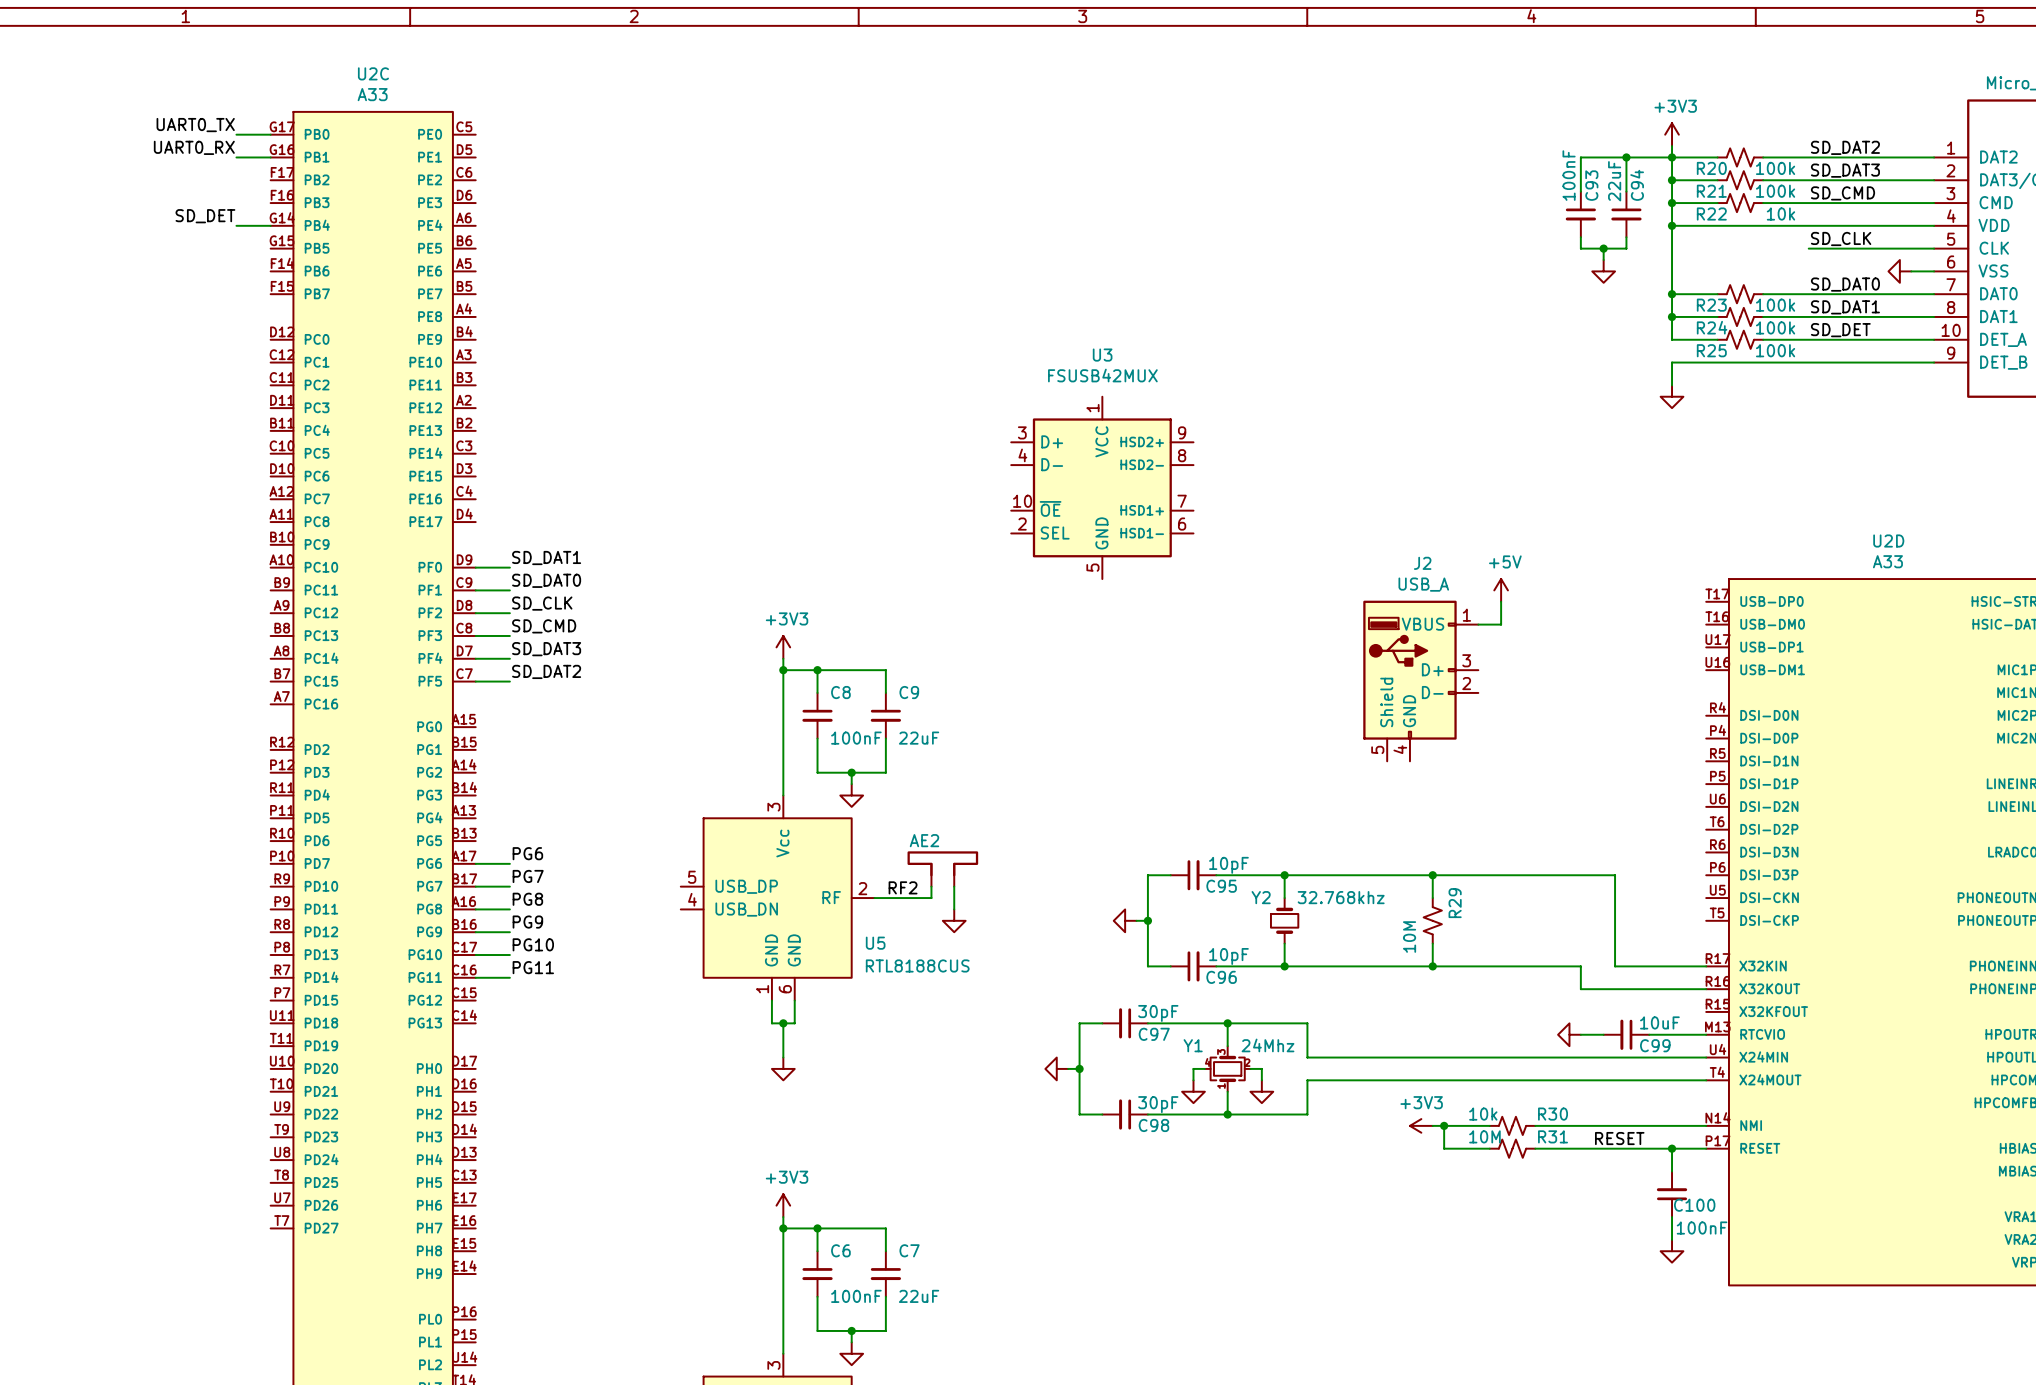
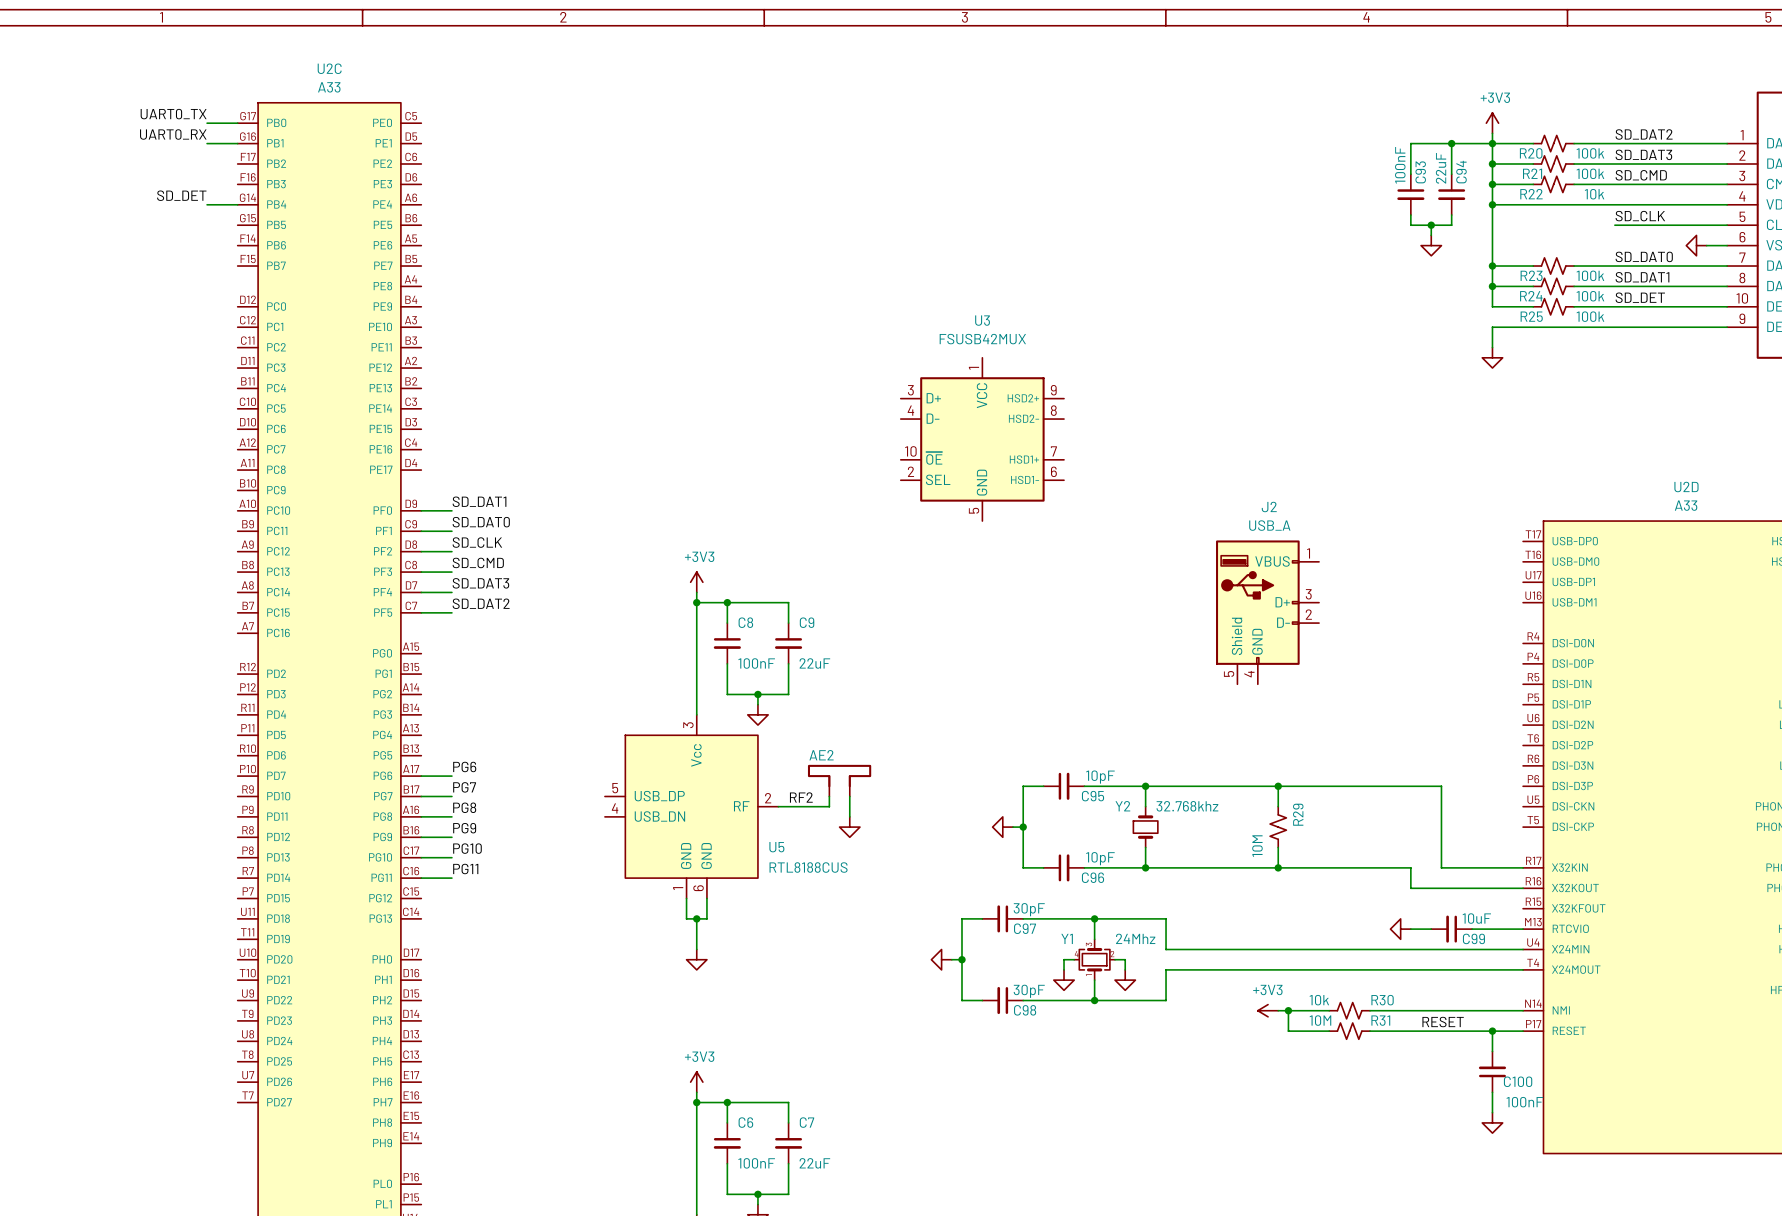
power symbol: +5V (1501, 590) -> none
wire: (1501, 601) (1501, 624) (1478, 624) -> none

